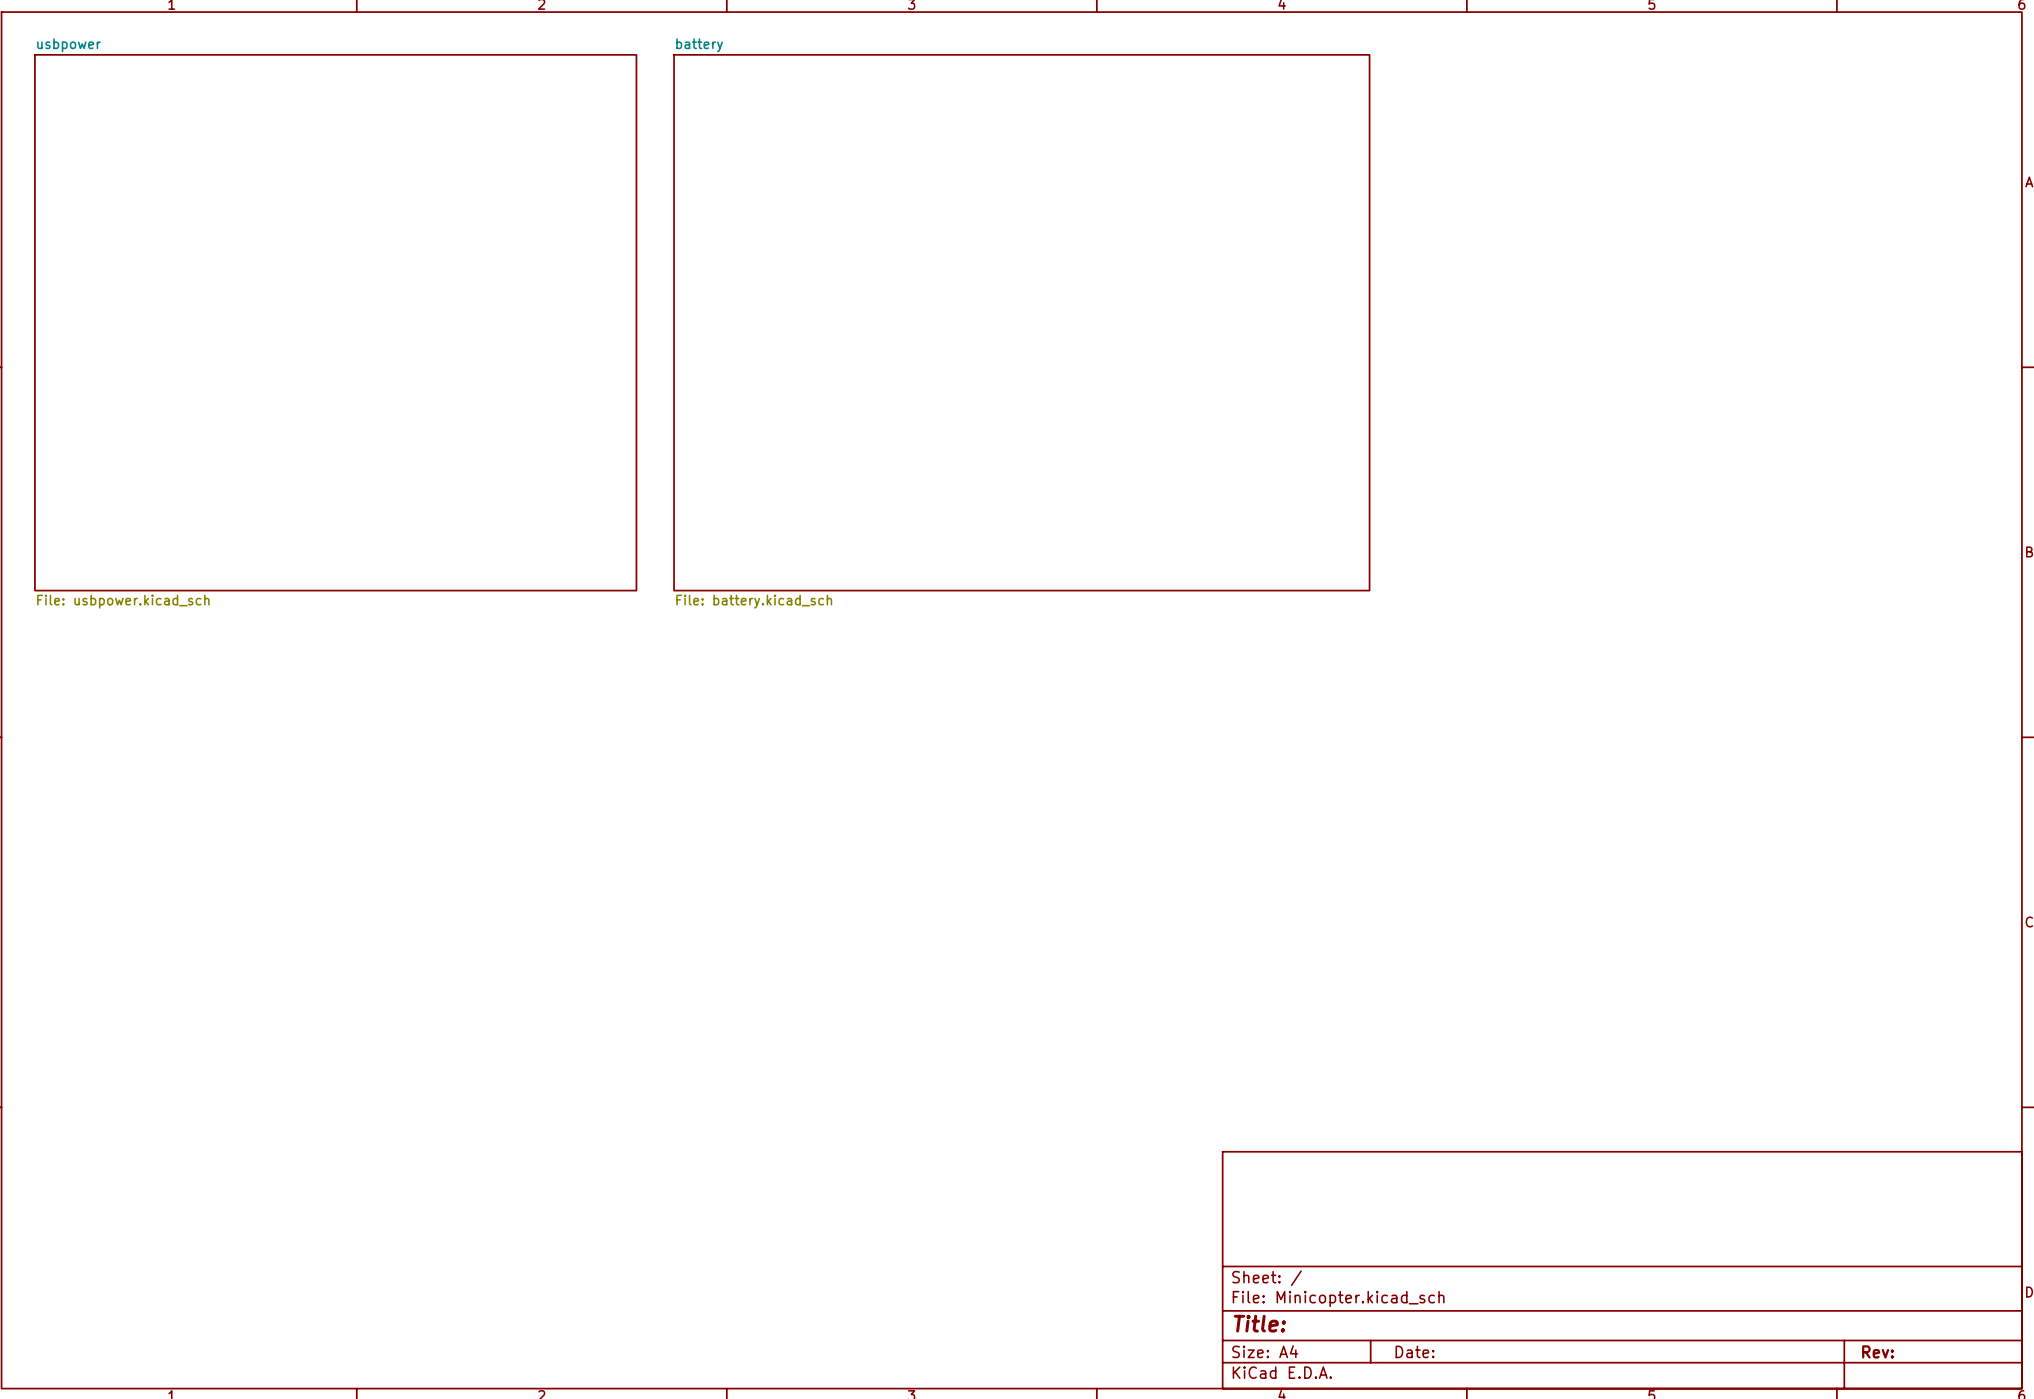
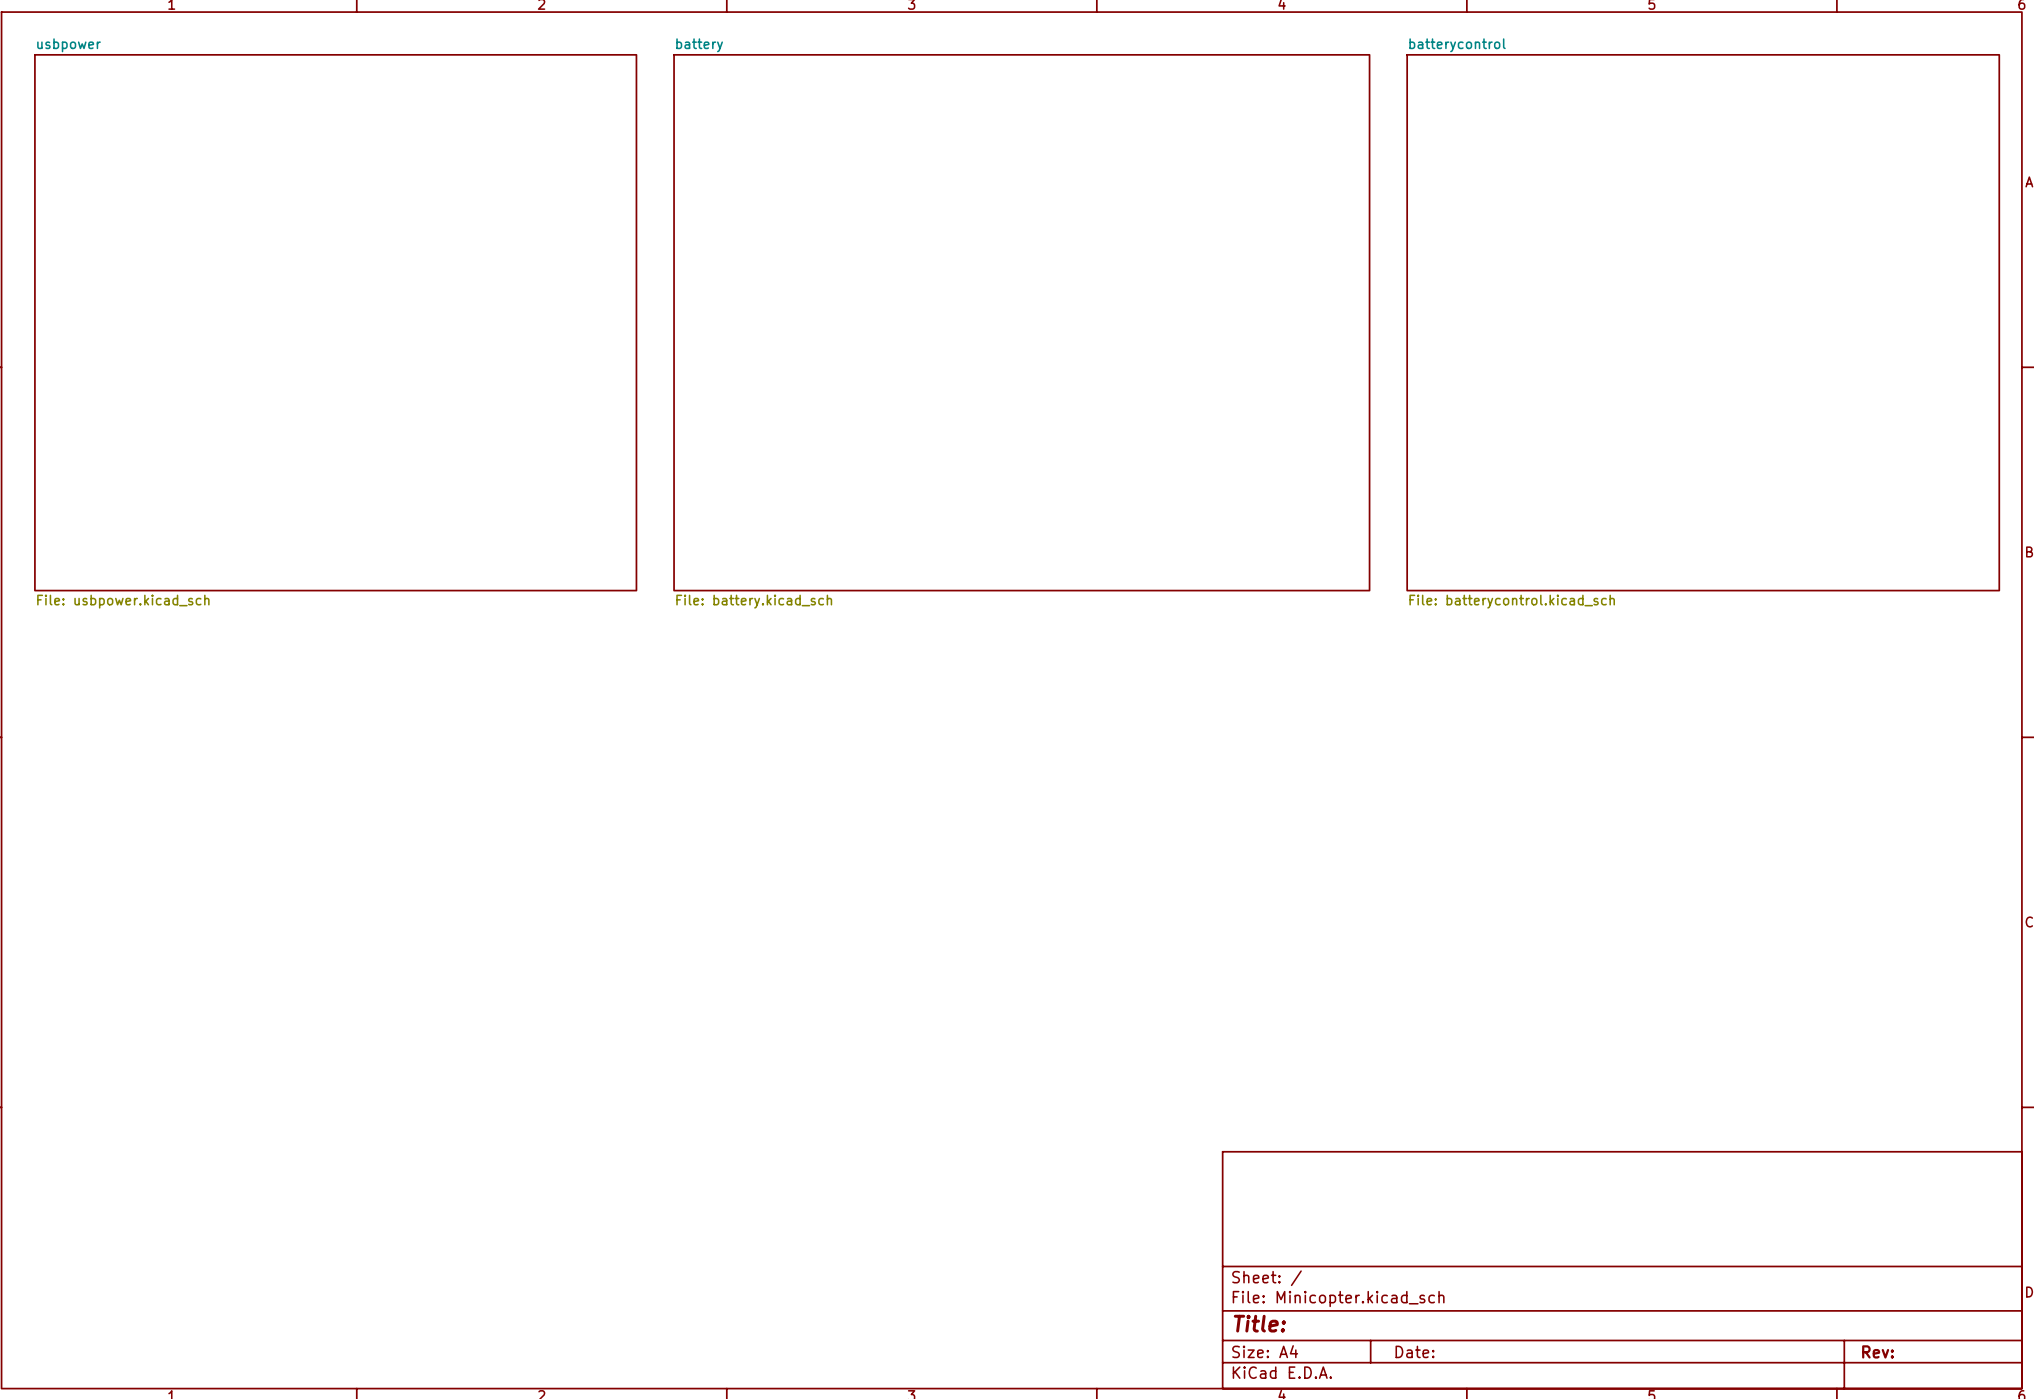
sheet batterycontrol: none -> File: batterycontrol.kicad_sch (1703, 322)

